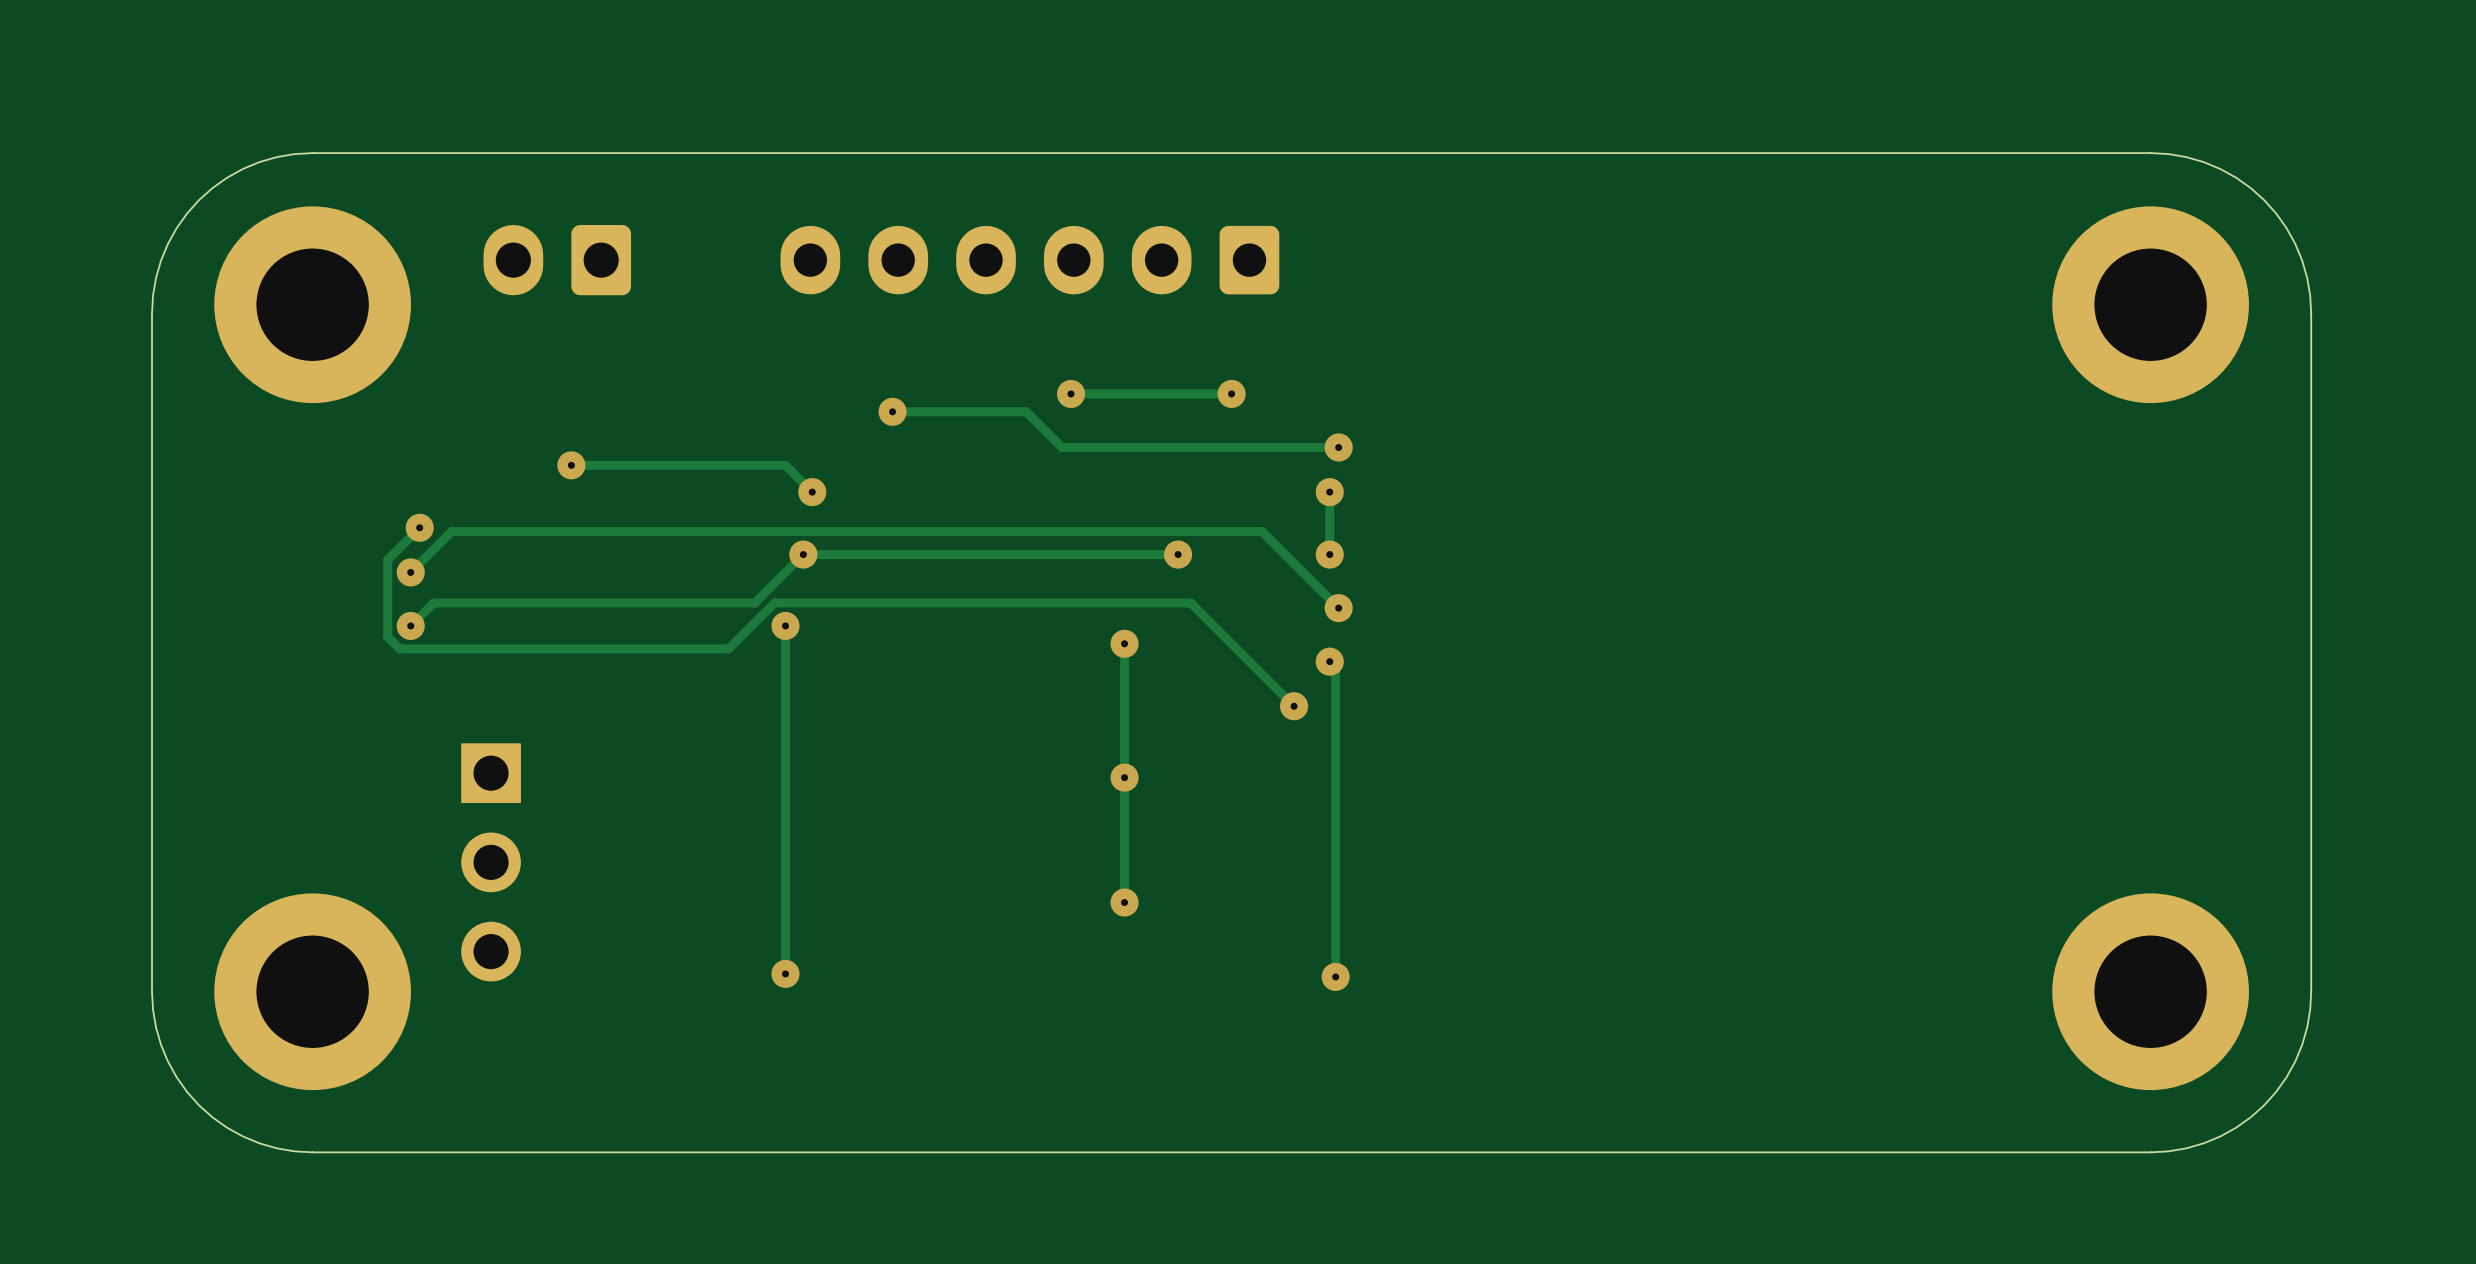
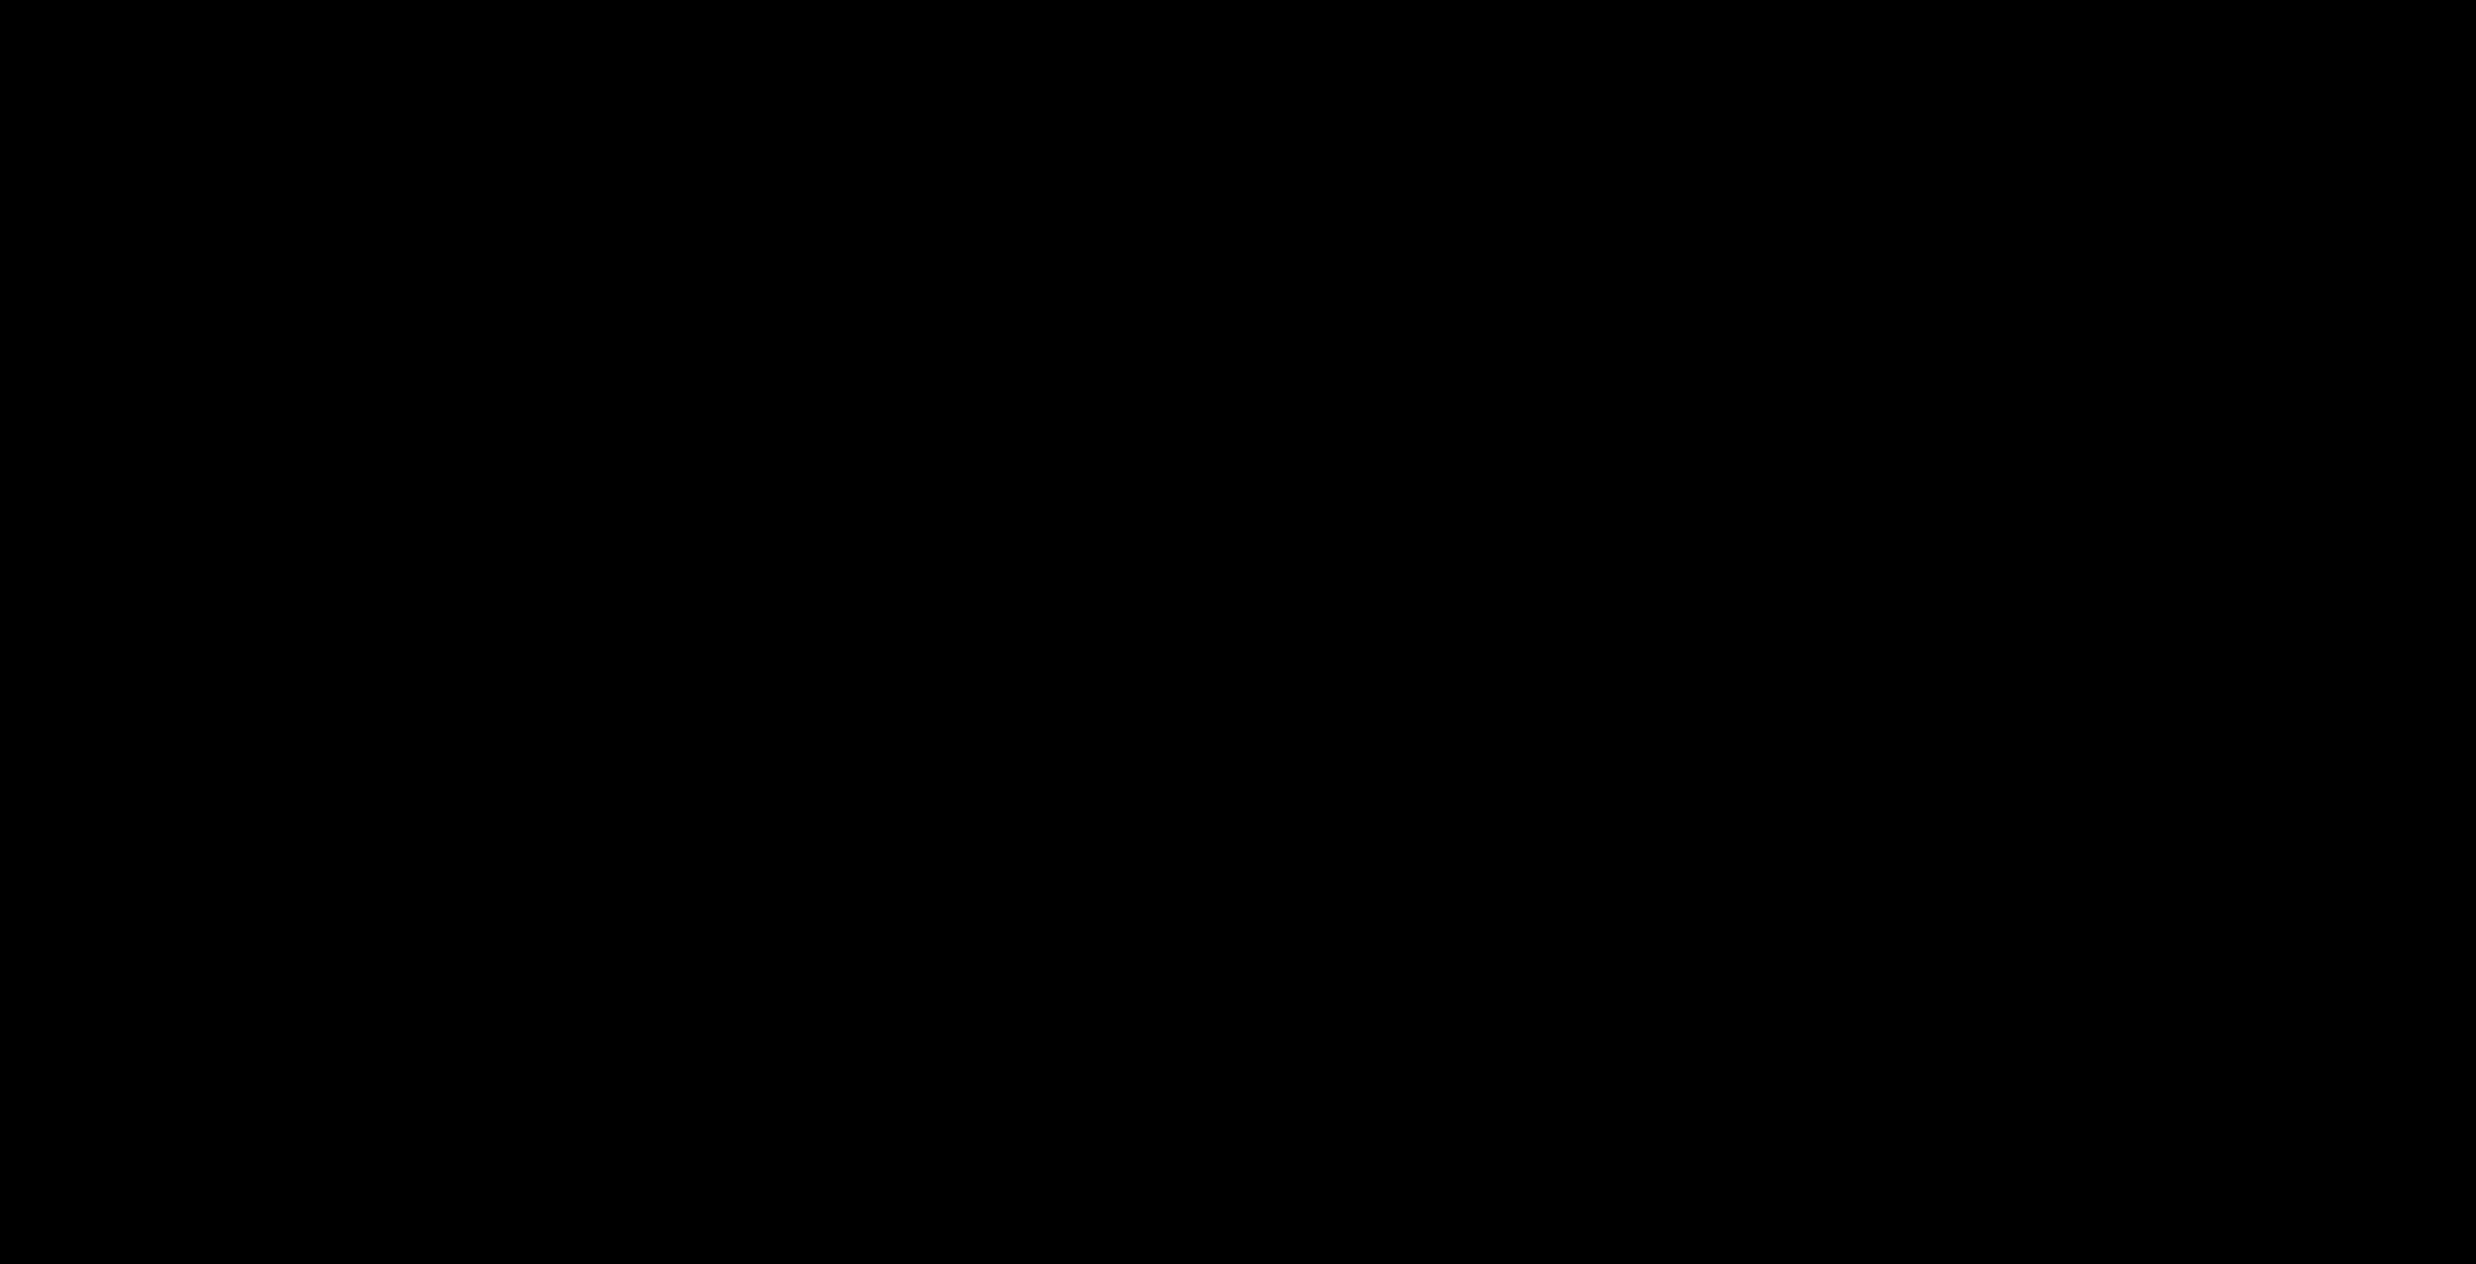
board edge: (2150, 153) (312, 153) (276, 157) (242, 168) (227, 177) (199, 200) (176, 228) (161, 260) (153, 295) (152, 991) (156, 1027) (167, 1061) (176, 1077) (199, 1105) (227, 1127) (242, 1136) (276, 1148) (312, 1152) (2150, 1152) (2186, 1148) (2220, 1136) (2236, 1127) (2264, 1105) (2286, 1077) (2302, 1044) (2310, 1009) (2310, 295) (2307, 277) (2295, 243) (2286, 228) (2264, 200) (2236, 177) (2220, 168) (2186, 157) (2150, 153) -> none
part: (557, 260) -> none
part: (1029, 260) -> none
part: (312, 304) -> none
part: (2150, 304) -> none
via: (1071, 393) -> none
track: (1231, 393) (1071, 393) -> none
via: (1231, 393) -> none
track: (892, 411) (1026, 411) (1062, 447) (1338, 447) -> none
via: (892, 411) -> none
via: (1338, 447) -> none
track: (571, 465) (785, 465) (812, 492) -> none
via: (571, 465) -> none
via: (812, 492) -> none
track: (1329, 492) (1329, 554) -> none
via: (1329, 492) -> none
track: (419, 527) (387, 559) (387, 636) (399, 648) (728, 648) (774, 602) (1190, 602) (1294, 706) -> none
via: (419, 527) -> none
via: (803, 554) -> none
track: (1178, 554) (803, 554) (754, 602) (433, 602) (410, 625) -> none
via: (1178, 554) -> none
via: (1329, 554) -> none
track: (410, 572) (451, 531) (1262, 531) (1338, 608) -> none
via: (410, 572) -> none
via: (1338, 608) -> none
via: (410, 625) -> none
track: (785, 625) (785, 973) -> none
via: (785, 625) -> none
track: (1124, 643) (1124, 902) -> none
via: (1124, 643) -> none
track: (1329, 661) (1335, 667) (1335, 976) -> none
via: (1329, 661) -> none
via: (1294, 706) -> none
via: (1124, 777) -> none
part: (491, 862) -> none
via: (1124, 902) -> none
via: (785, 973) -> none
via: (1335, 976) -> none
part: (312, 991) -> none
part: (2150, 991) -> none

